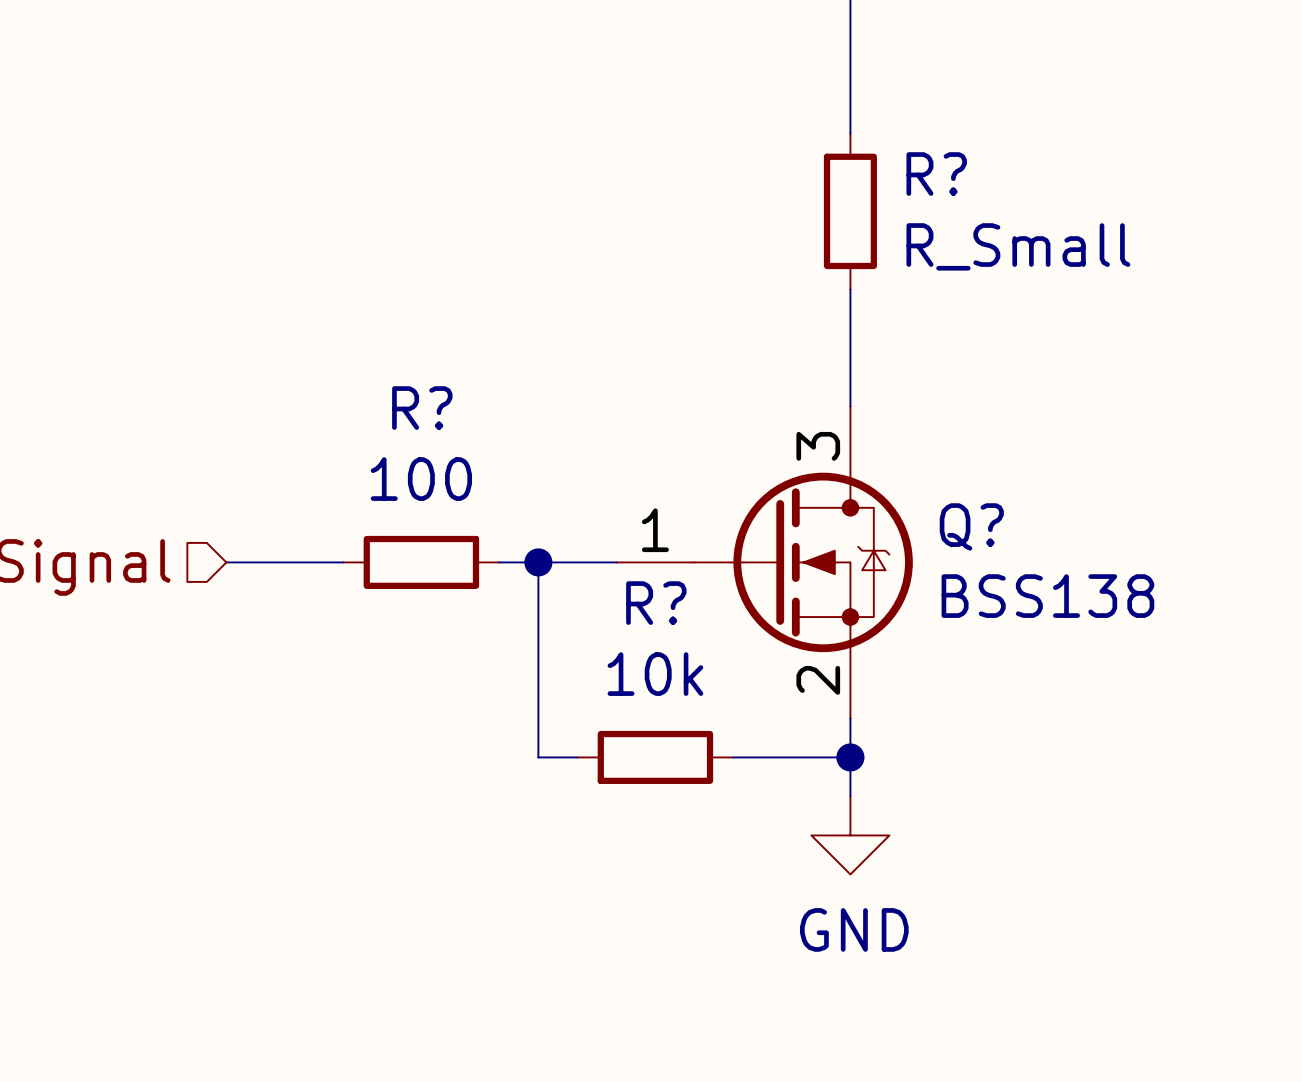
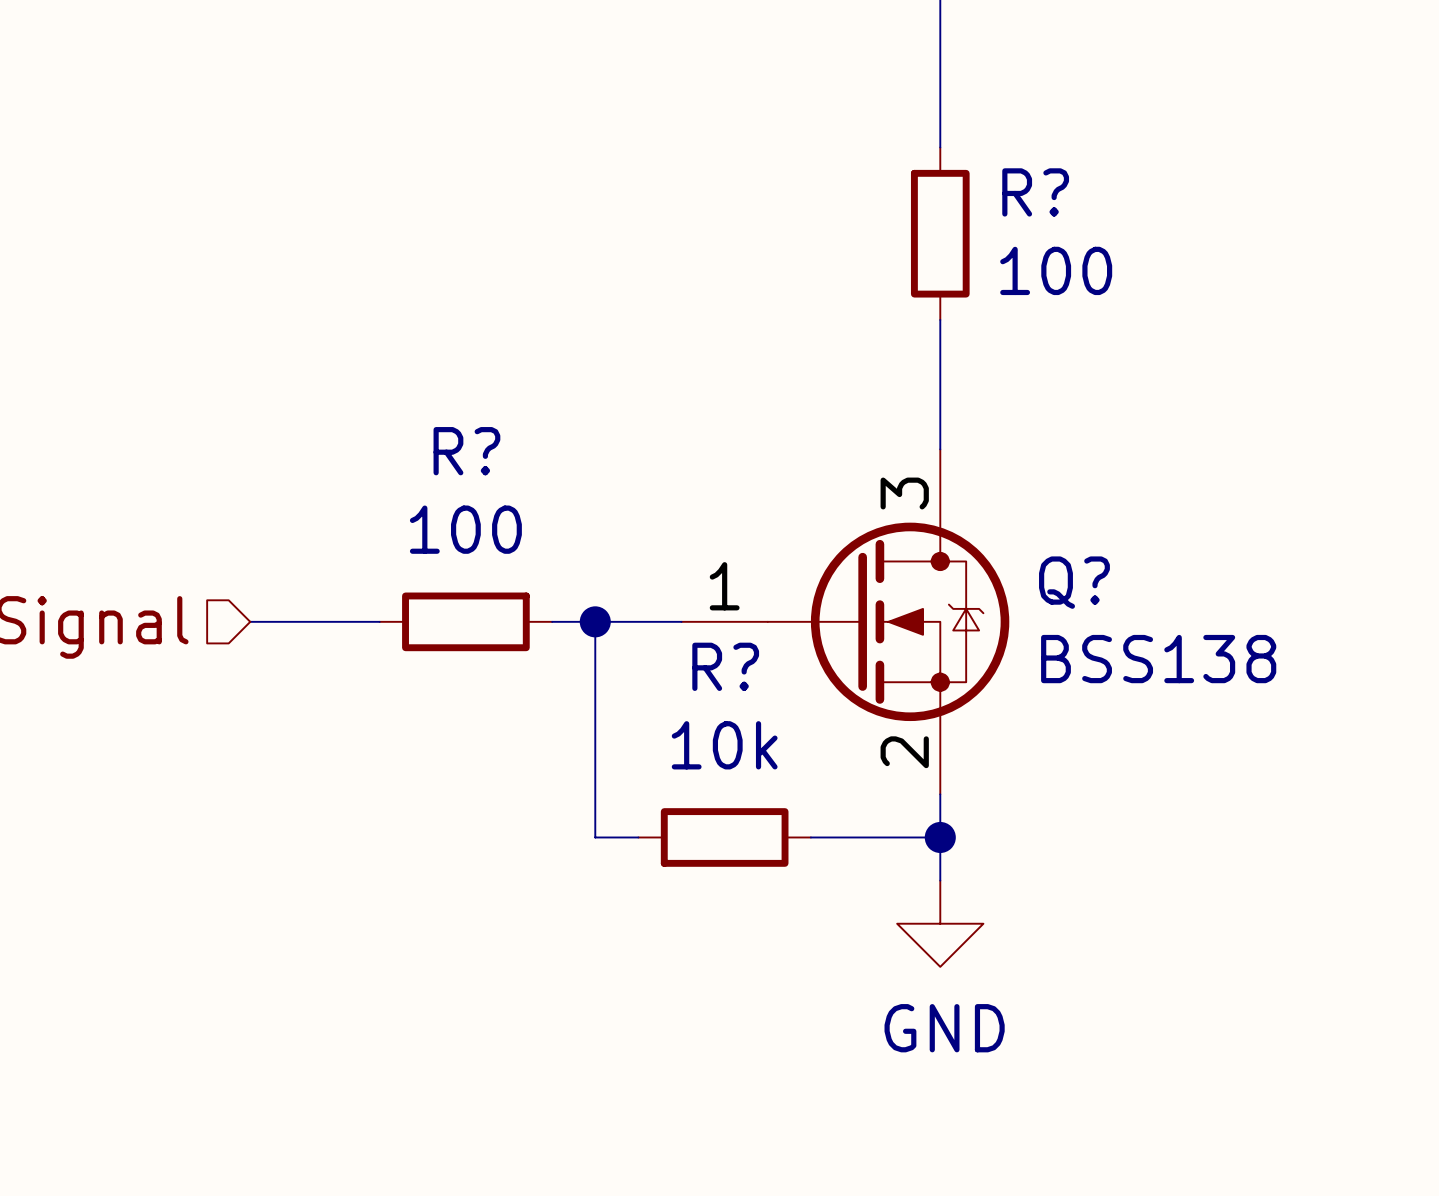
R? value: R_Small (1018, 246) -> 100 (1056, 270)

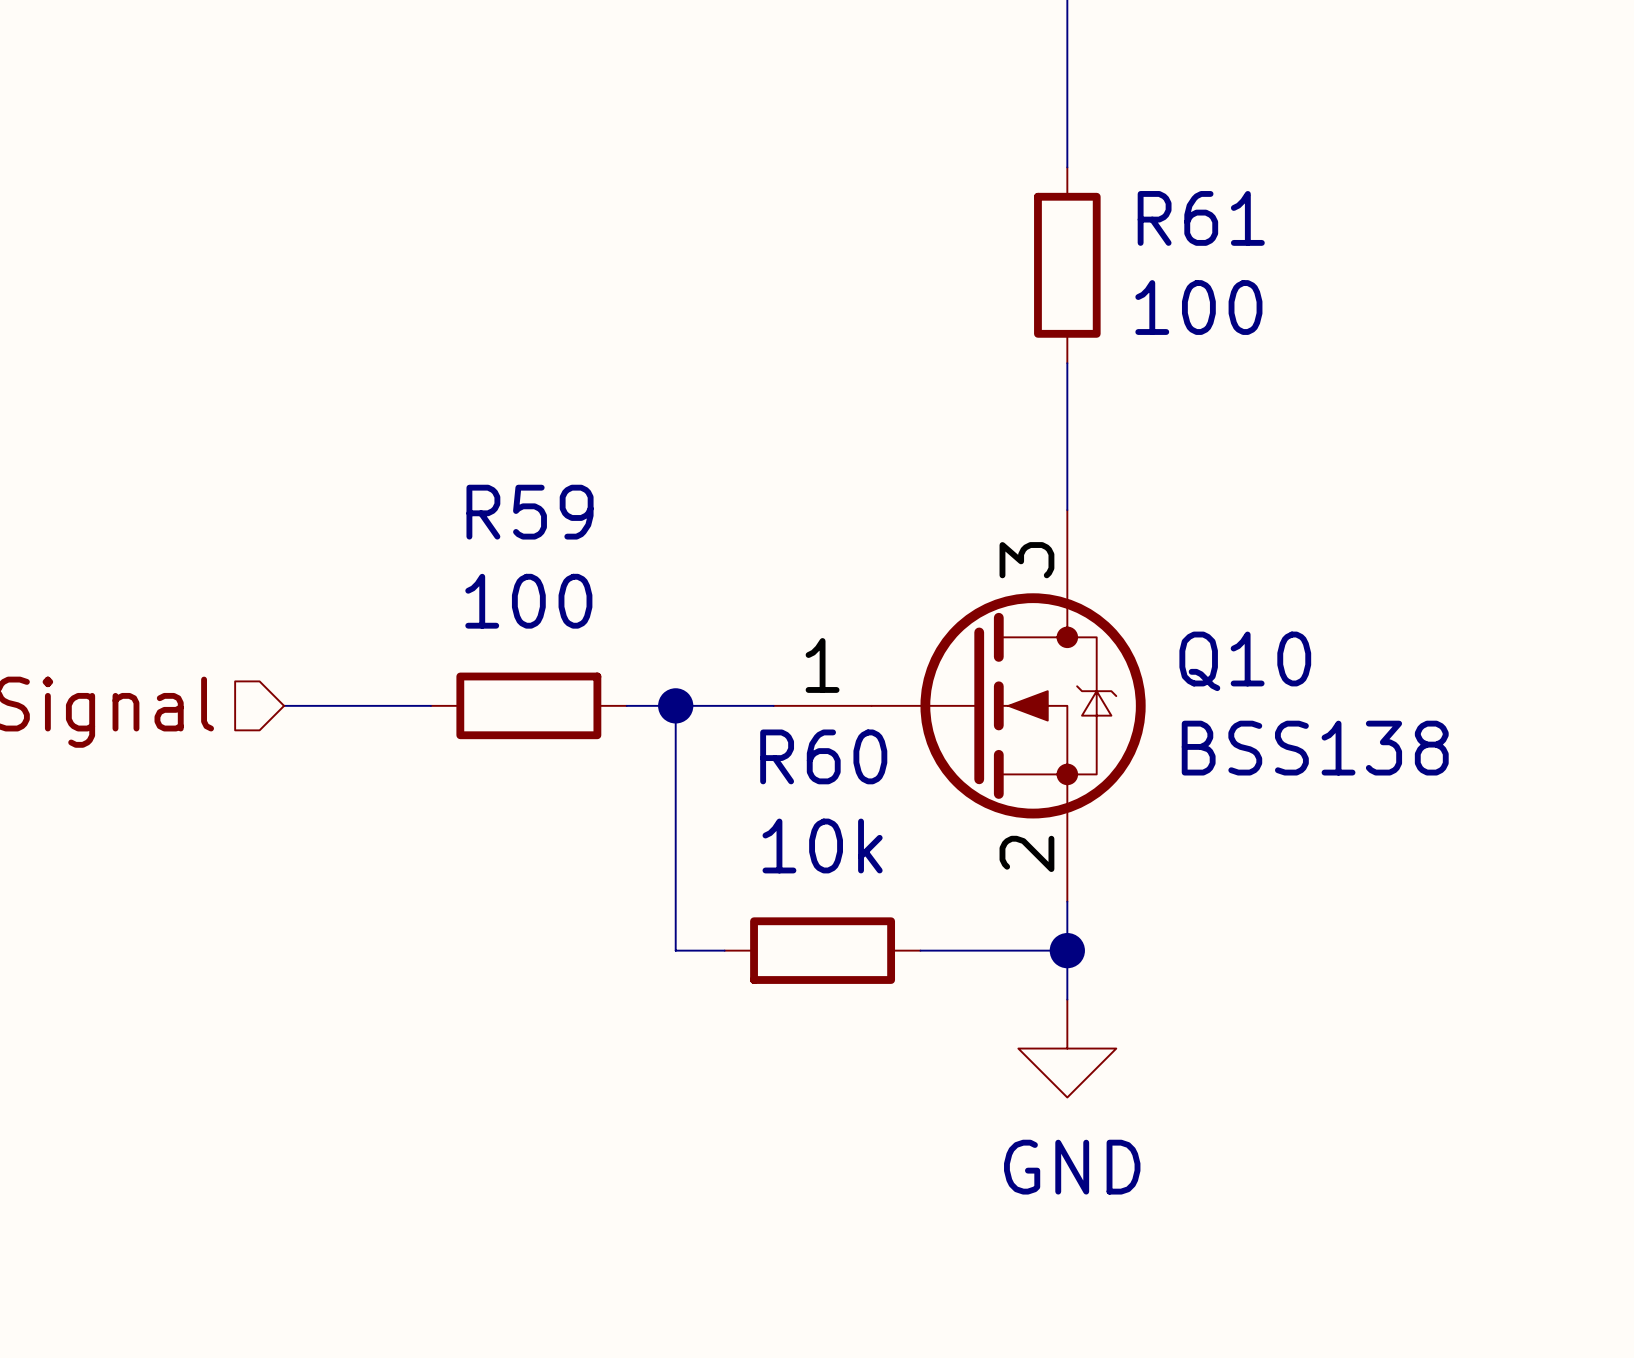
R? name: R? (1035, 192) -> R61 (1201, 218)
R? name: R? (466, 451) -> R59 (530, 512)
Q? name: Q? (1074, 582) -> Q10 (1245, 661)
R? name: R? (725, 666) -> R60 (823, 756)

